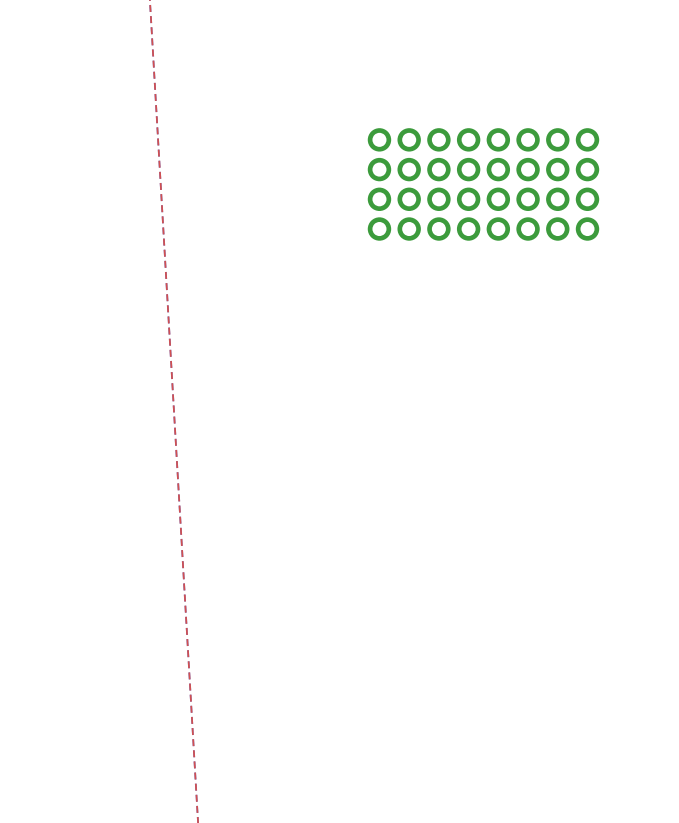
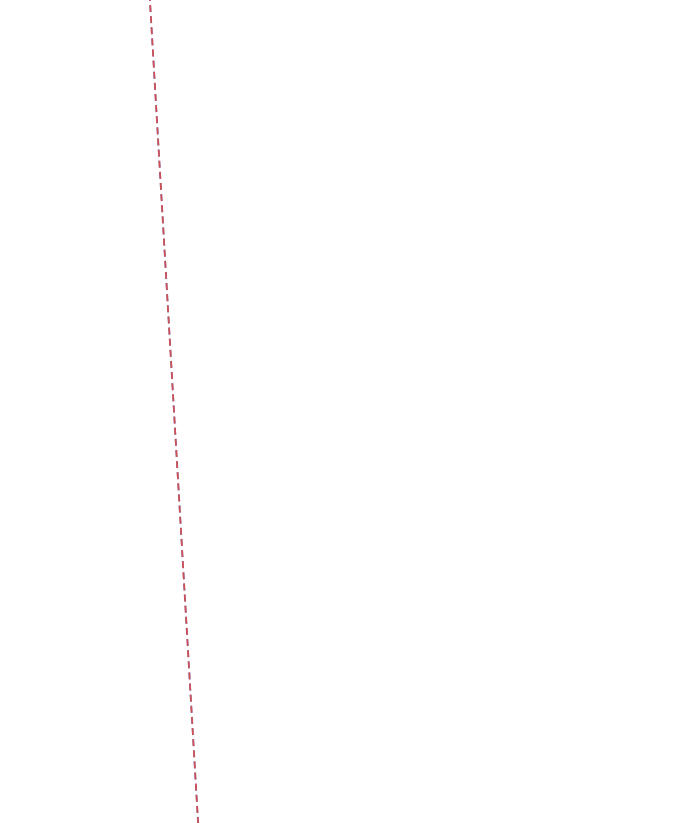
via: (379, 139) -> none
via: (409, 139) -> none
via: (438, 139) -> none
via: (468, 139) -> none
via: (498, 139) -> none
via: (528, 139) -> none
via: (557, 139) -> none
via: (587, 139) -> none
via: (379, 169) -> none
via: (409, 169) -> none
via: (438, 169) -> none
via: (468, 169) -> none
via: (498, 169) -> none
via: (528, 169) -> none
via: (557, 169) -> none
via: (587, 169) -> none
via: (379, 199) -> none
via: (409, 199) -> none
via: (438, 199) -> none
via: (468, 199) -> none
via: (498, 199) -> none
via: (528, 199) -> none
via: (557, 199) -> none
via: (587, 199) -> none
via: (379, 229) -> none
via: (409, 229) -> none
via: (438, 229) -> none
via: (468, 229) -> none
via: (498, 229) -> none
via: (528, 229) -> none
via: (557, 229) -> none
via: (587, 229) -> none

